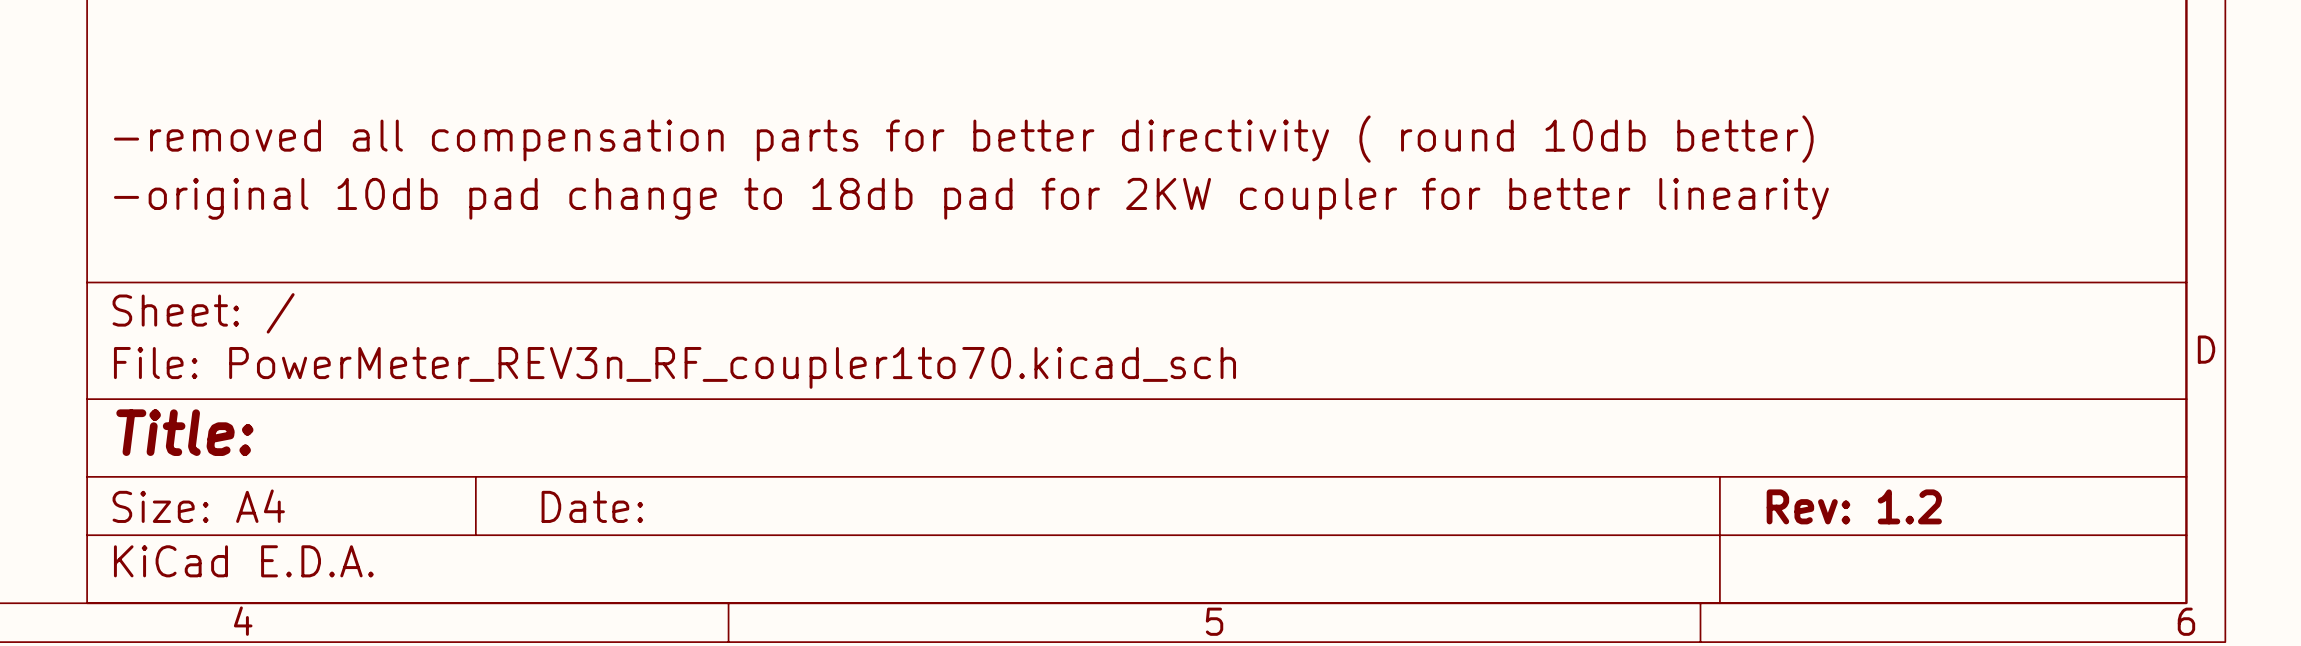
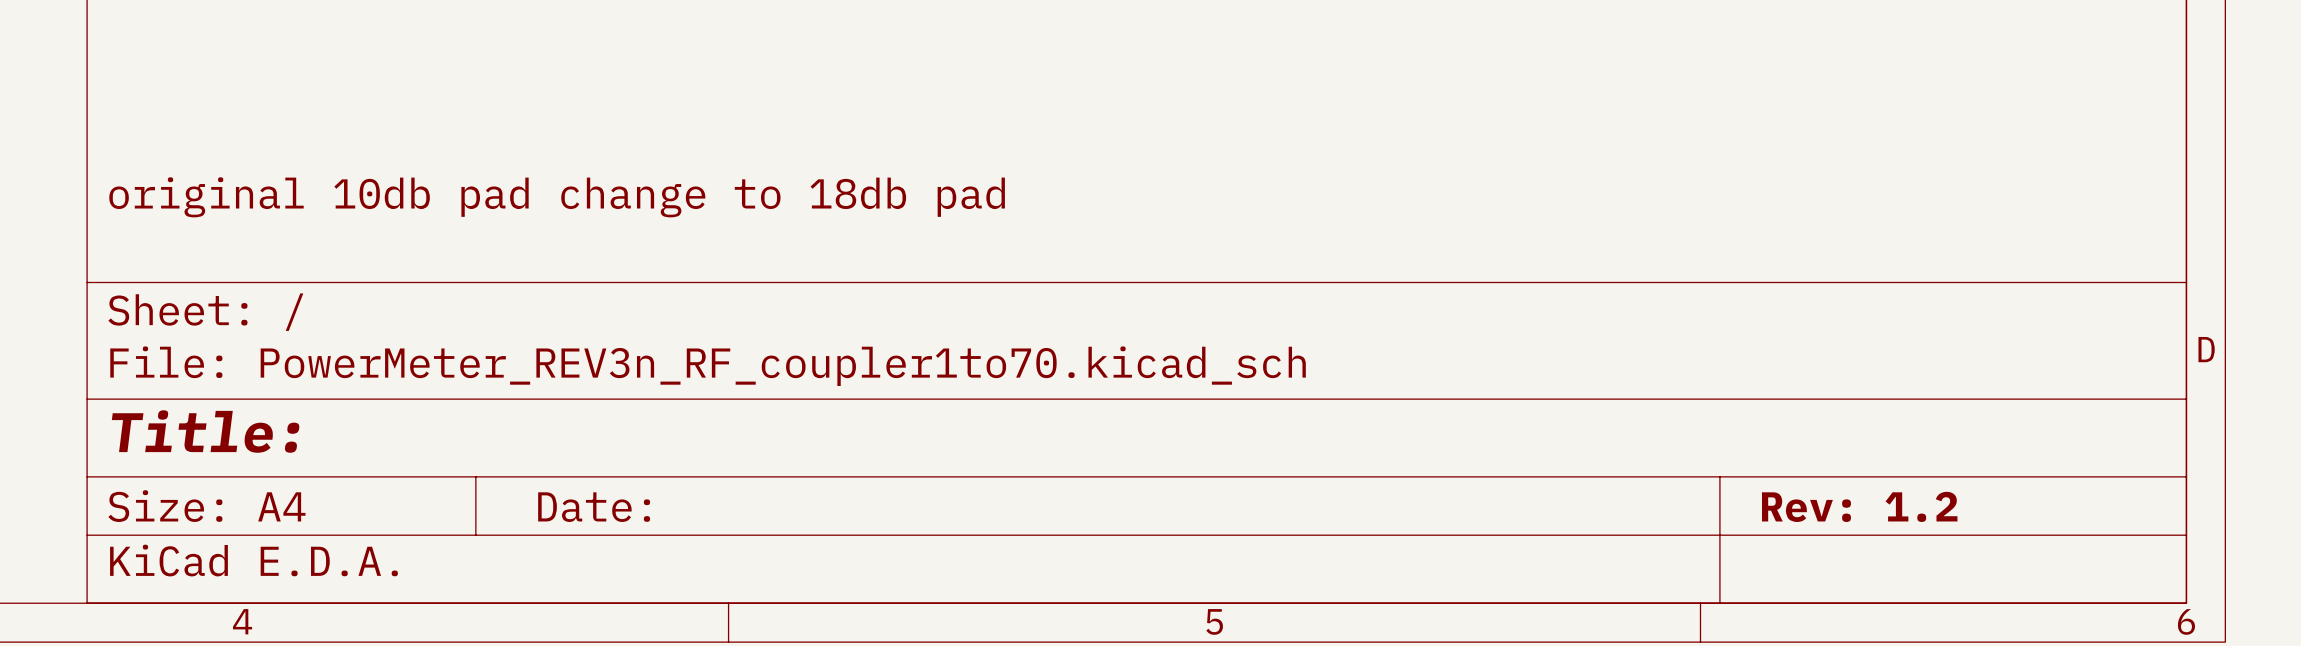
title block: -removed all compensation parts for better directivity ( round 10db better) (963, 139) -> none
title block: -original 10db pad change to 18db pad for 2KW coupler for better linearity (971, 198) -> original 10db pad change to 18db pad (557, 197)

